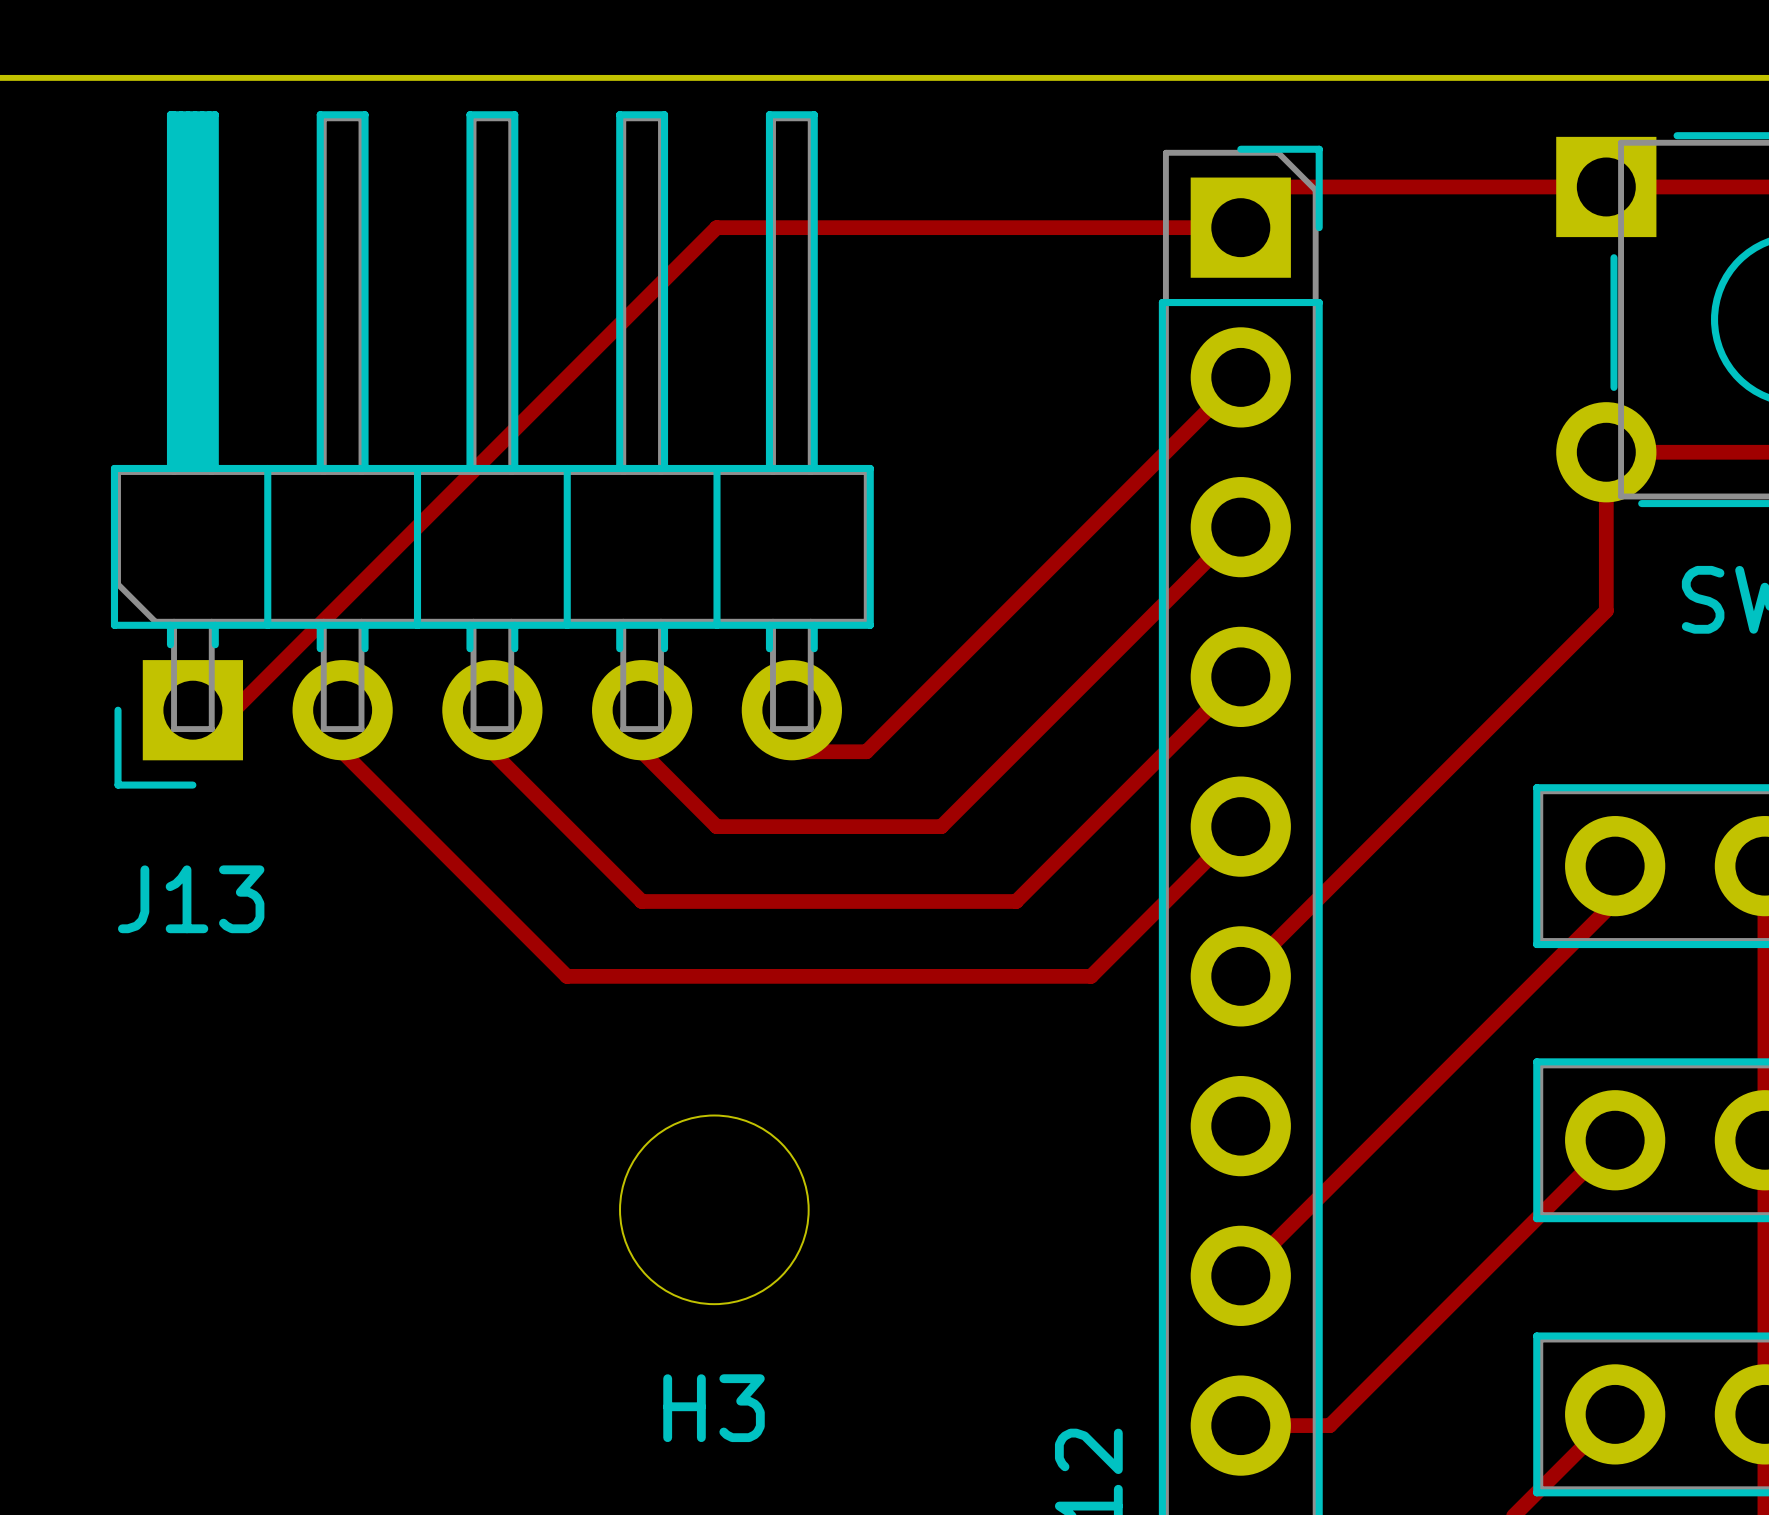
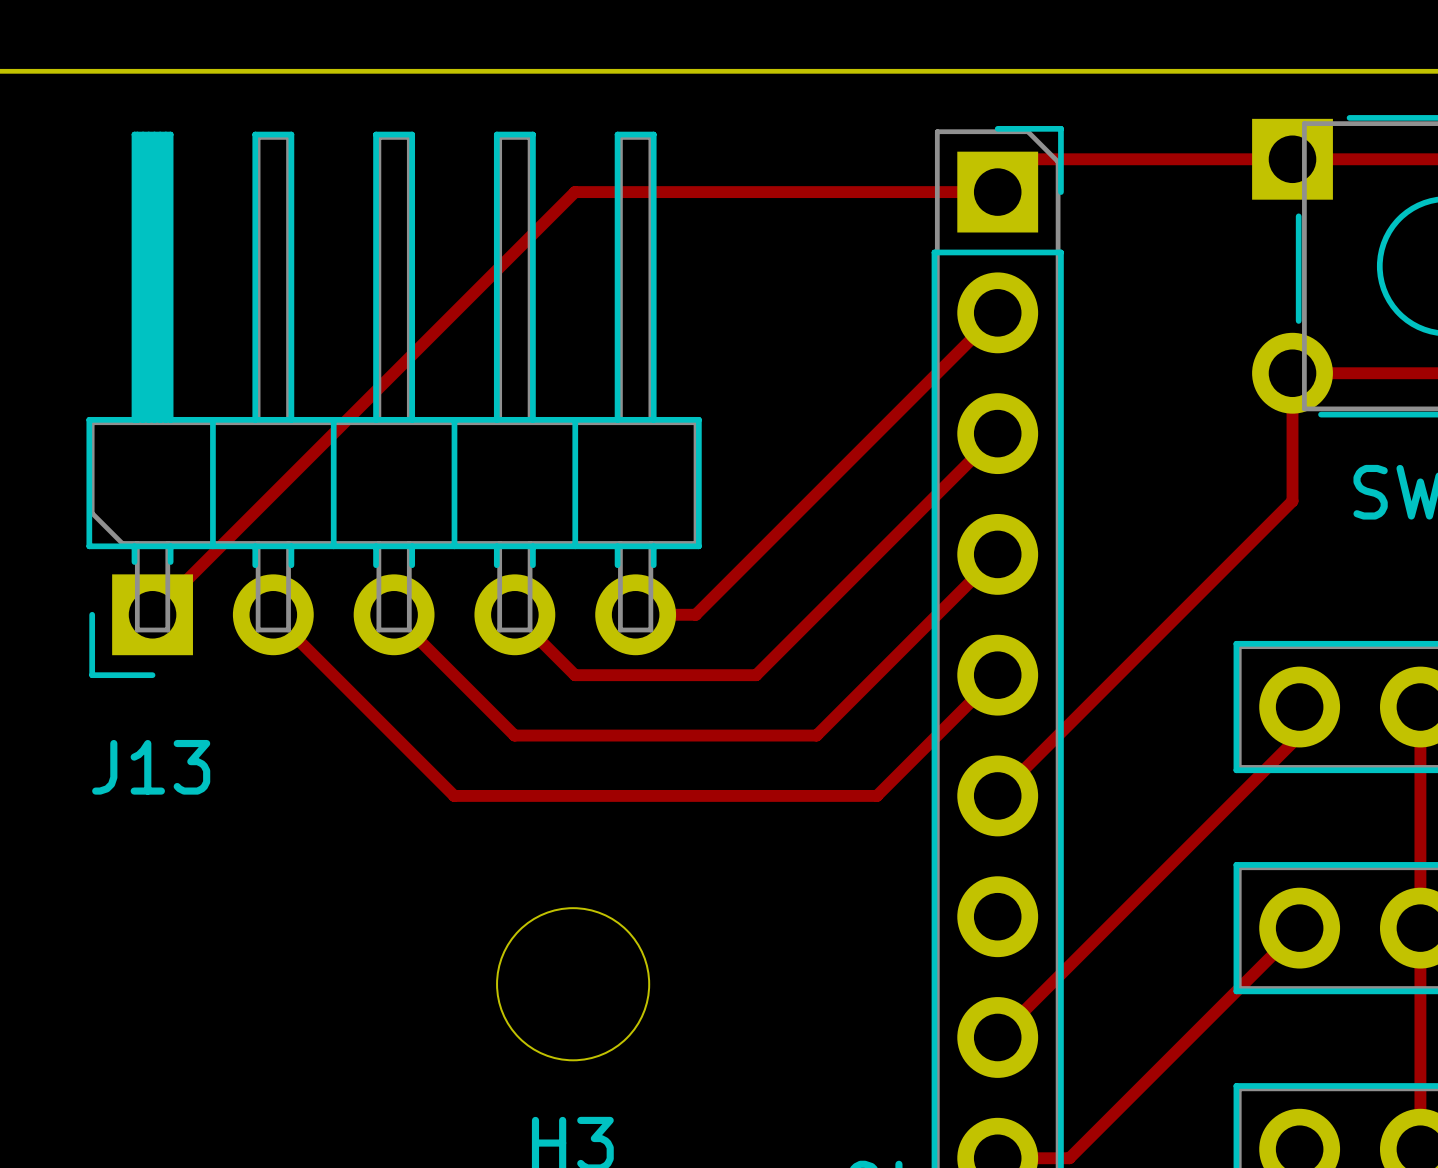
J13 position: (492, 449) -> (394, 404)

